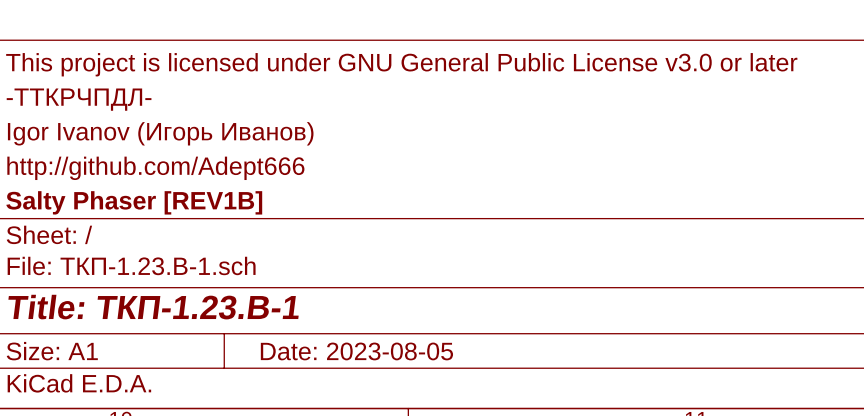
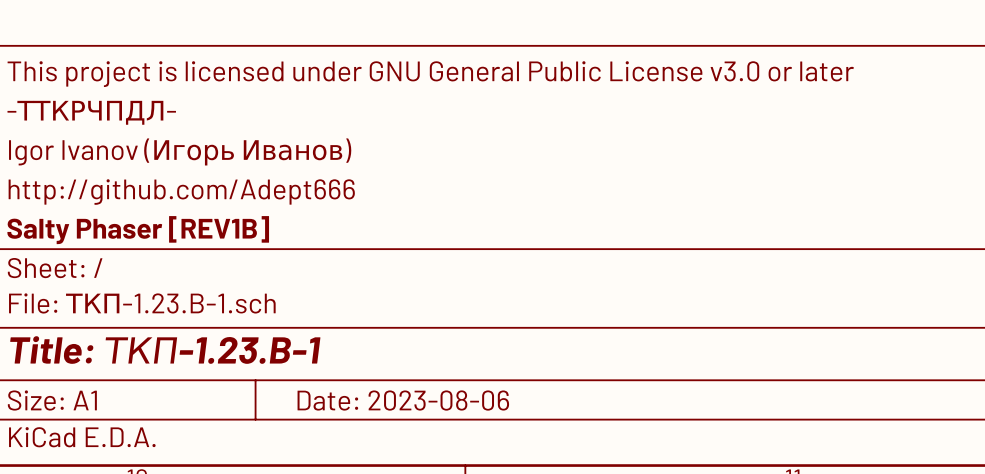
title block: Date: 2023-08-05 (356, 351) -> Date: 2023-08-06 (403, 400)

